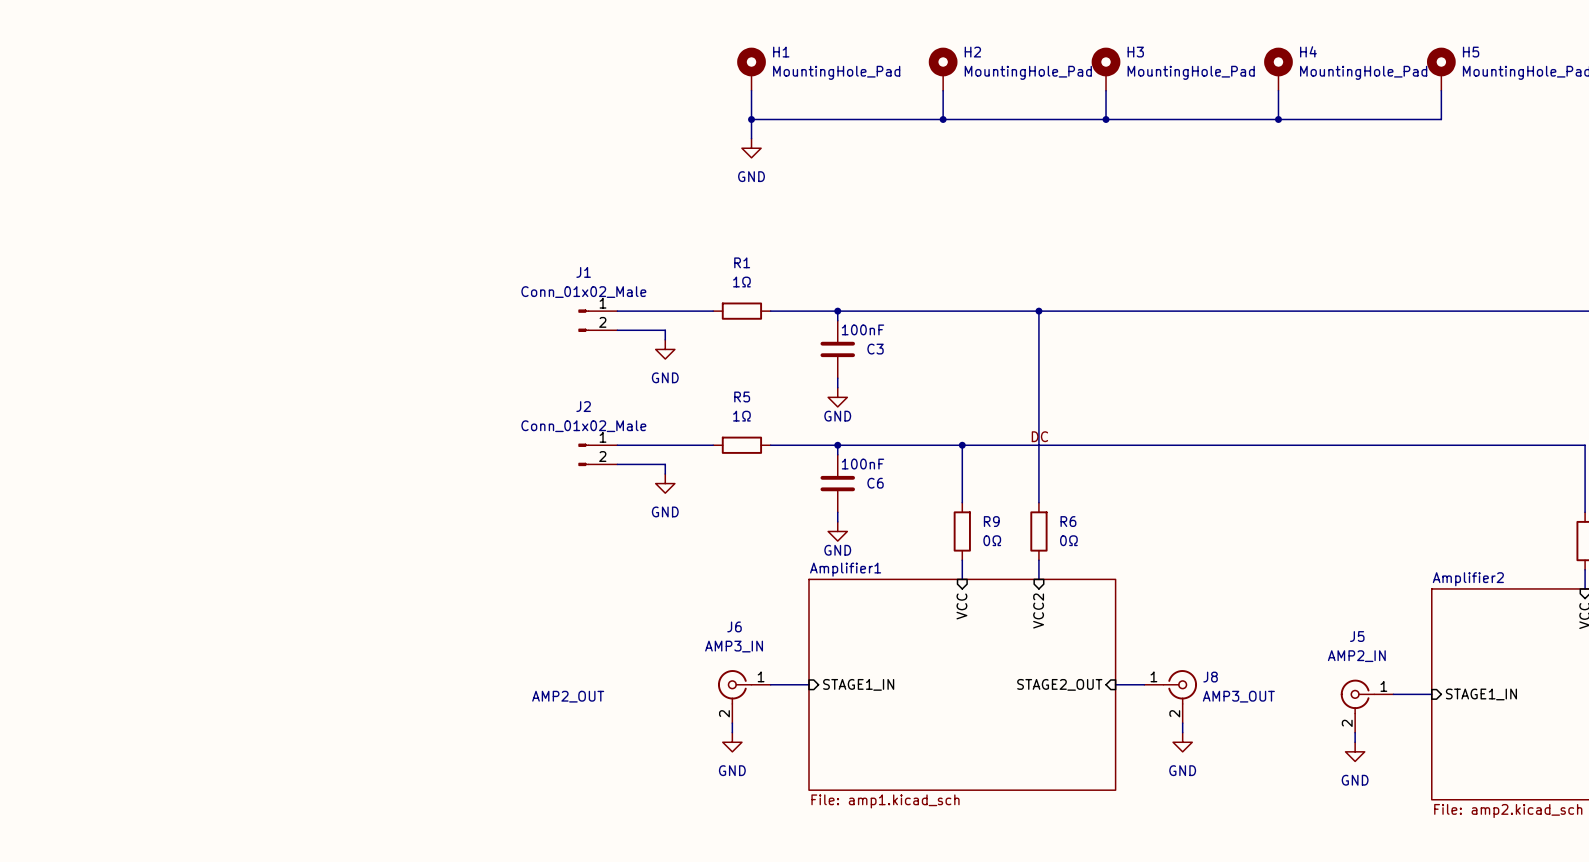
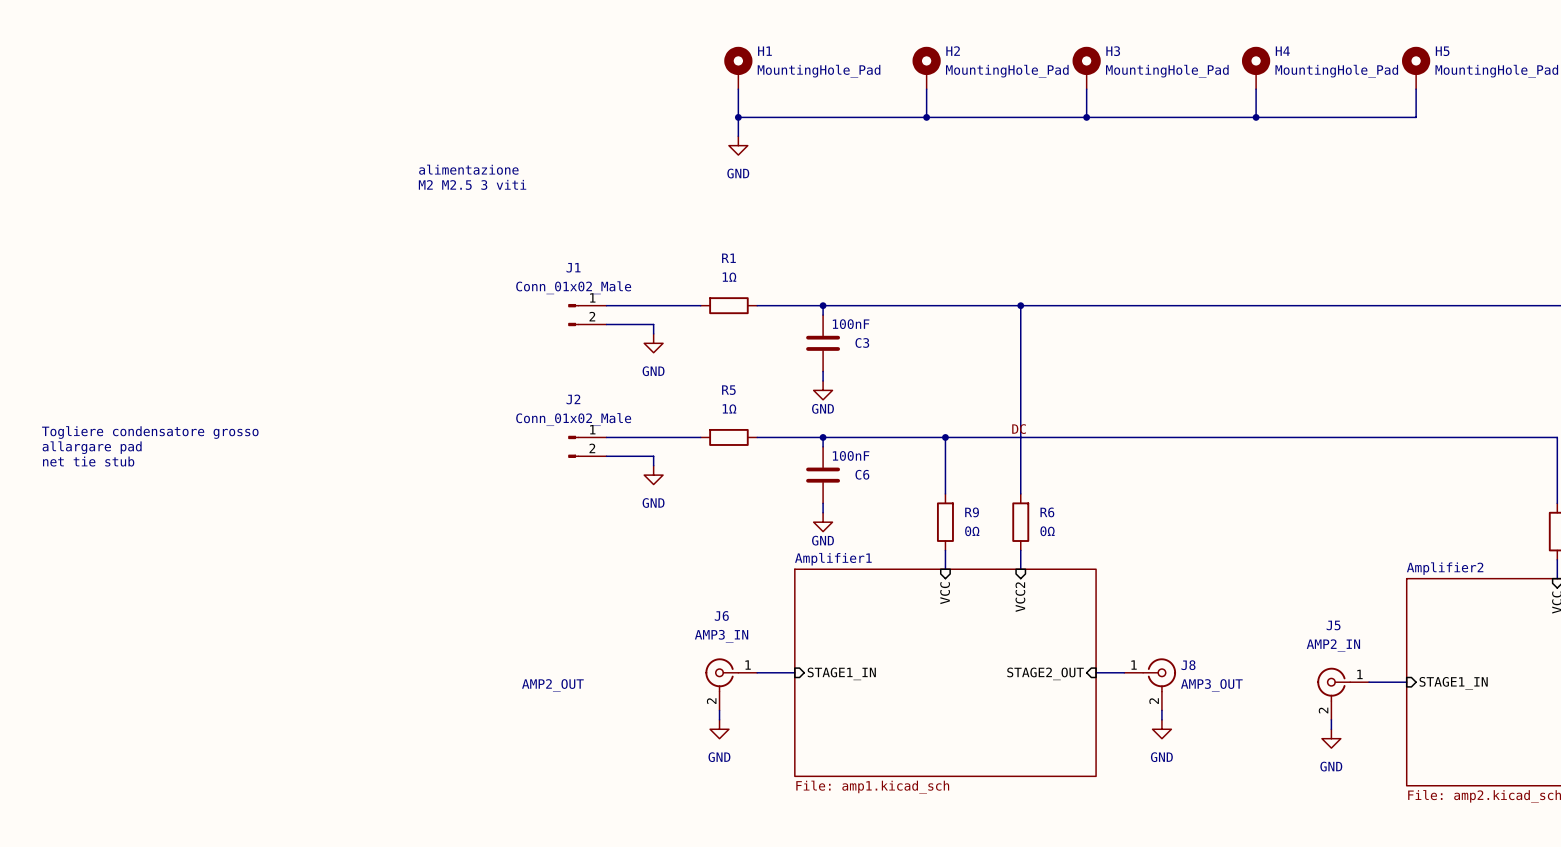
text: none -> alimentazione (468, 169)
text: none -> M2 M2.5 3 viti (472, 184)
text: none -> Togliere condensatore grosso (150, 432)
text: none -> allargare pad (92, 447)
text: none -> net tie stub (88, 461)

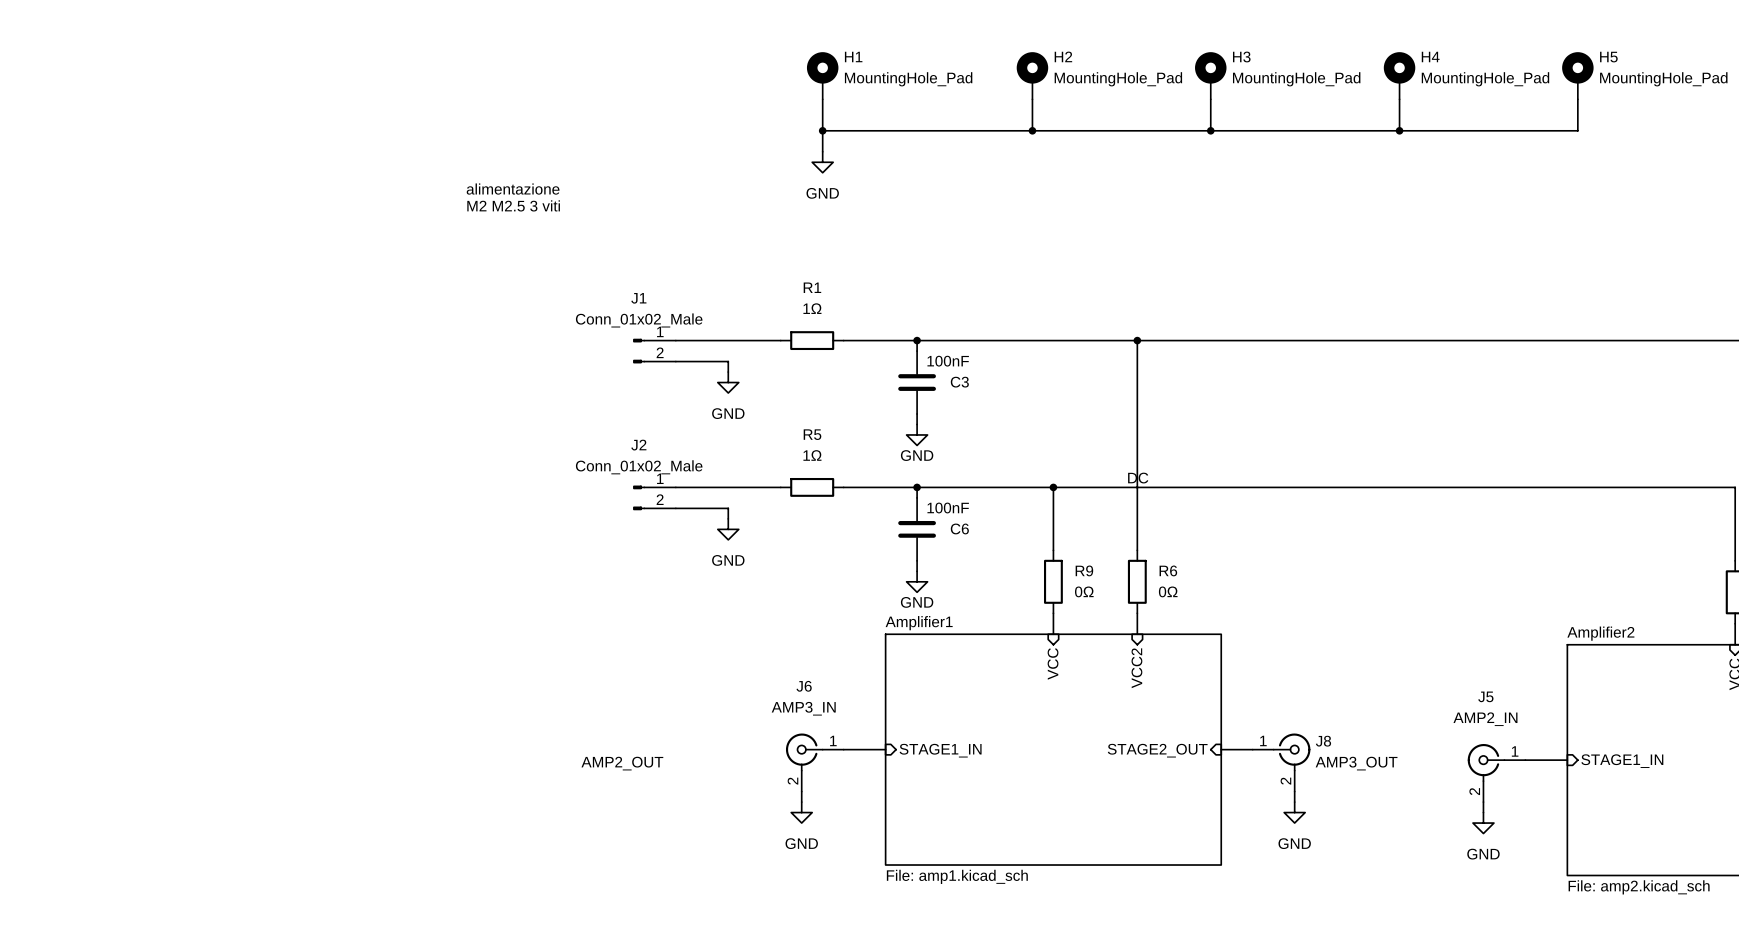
text: Togliere condensatore grosso (150, 432) -> none
text: allargare pad (92, 447) -> none
text: net tie stub (88, 461) -> none

